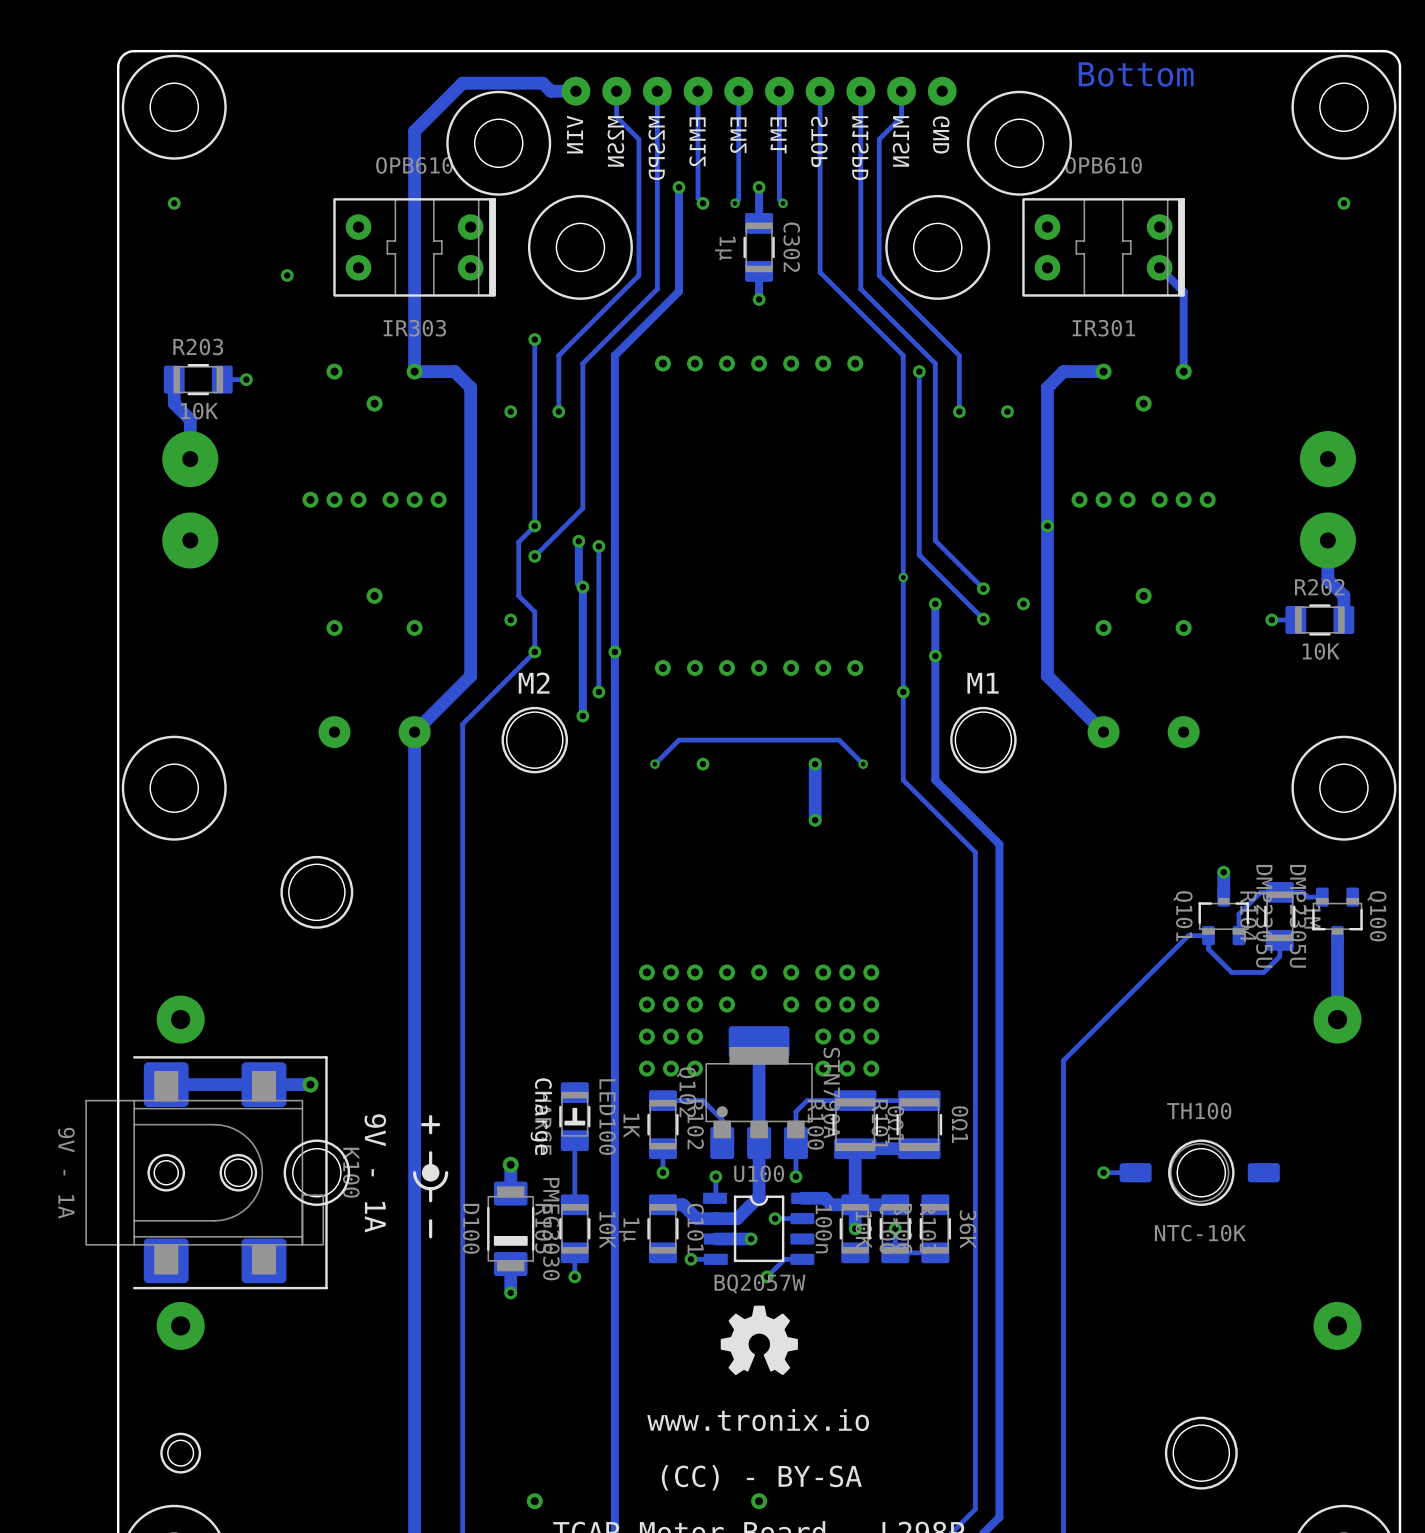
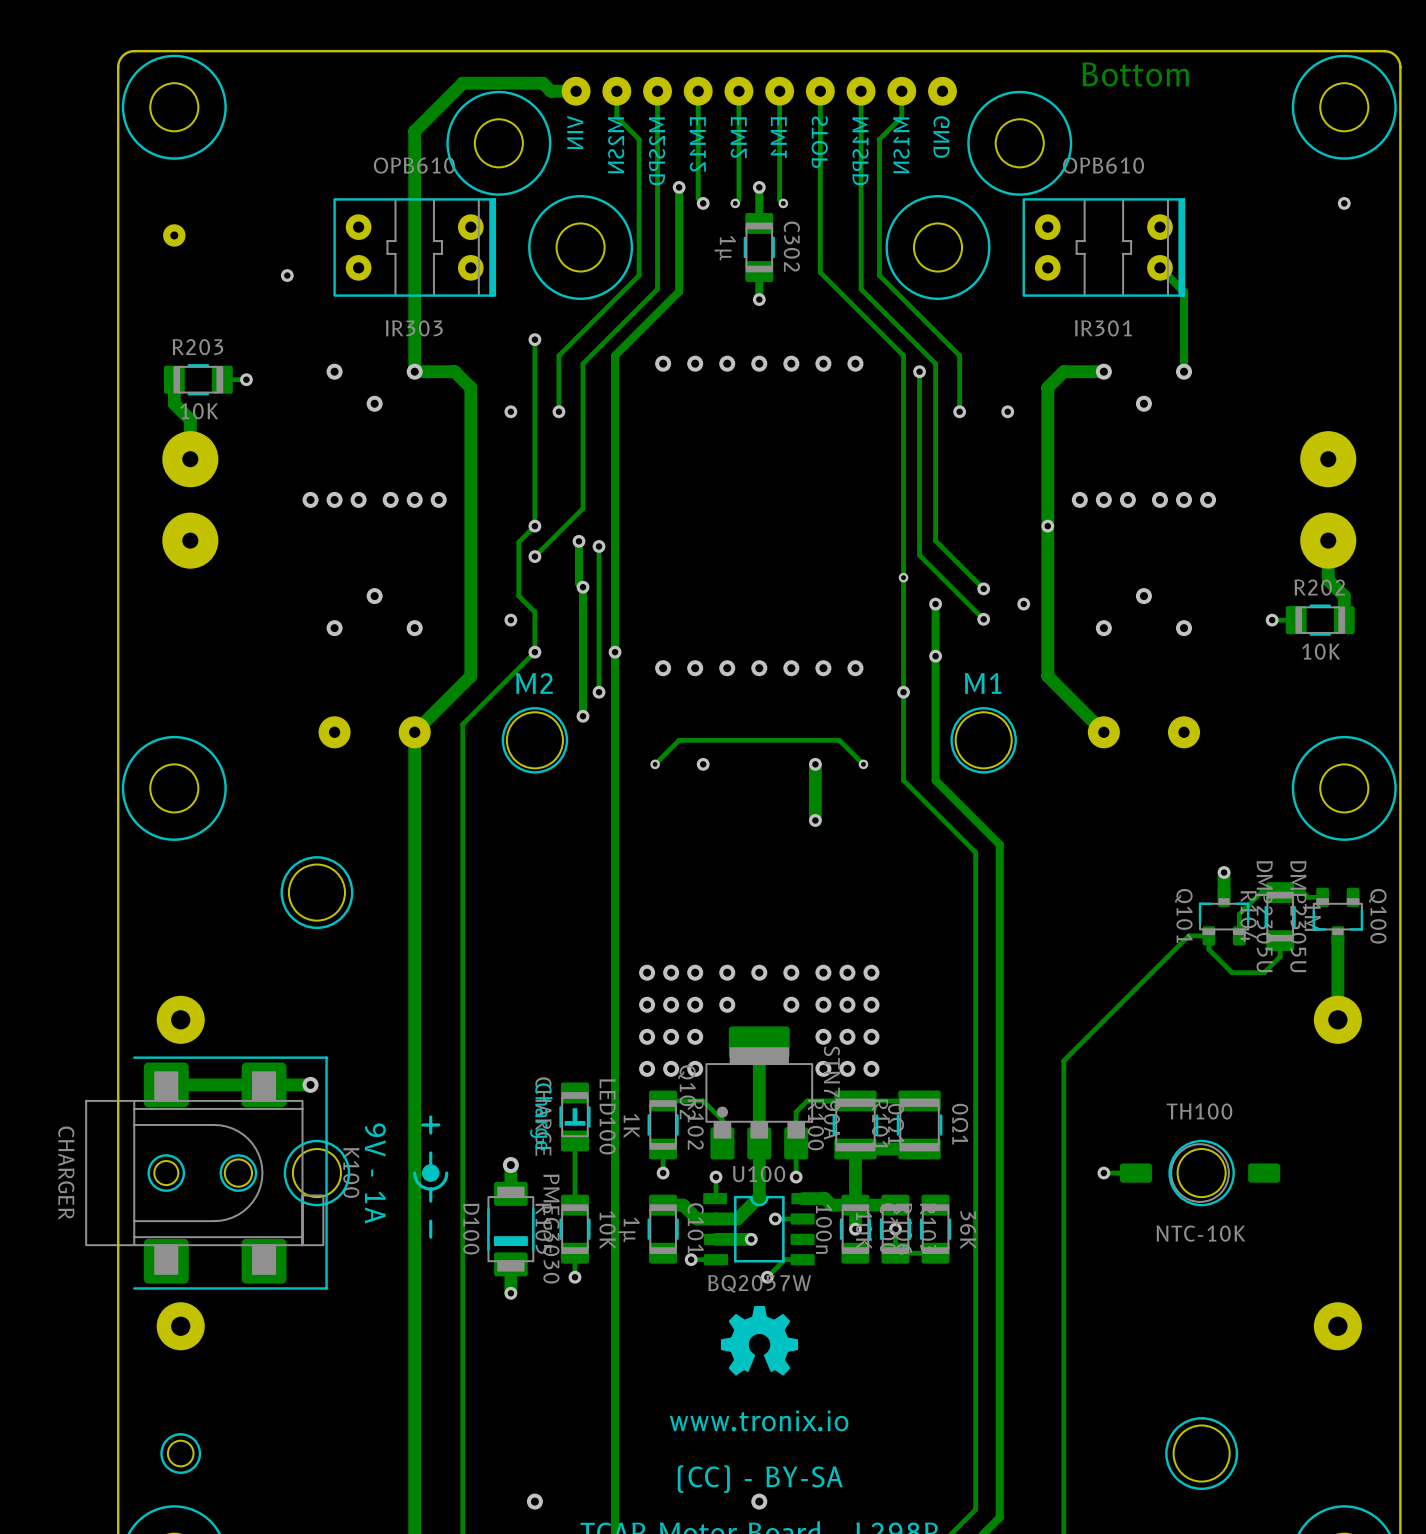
via: (174, 203) -> none
part: none -> (174, 235)
K100 value: 9V - 1A (66, 1173) -> CHARGER (66, 1173)

